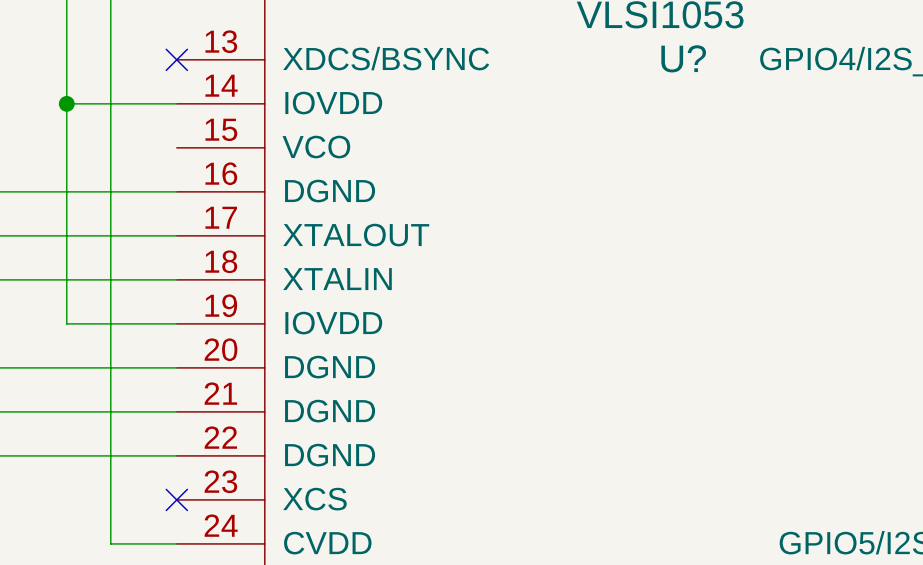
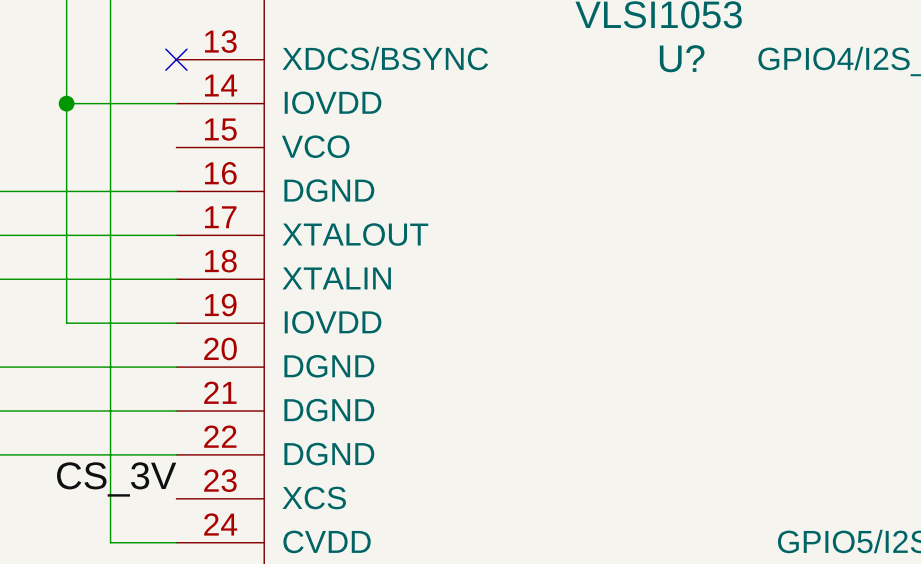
label: none -> CS_3V (116, 479)
no-connect mark: (176, 499) -> none

